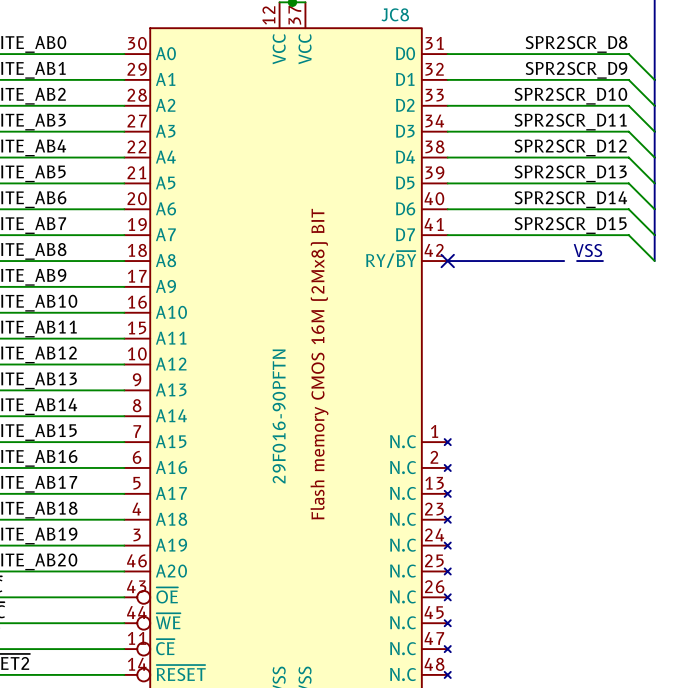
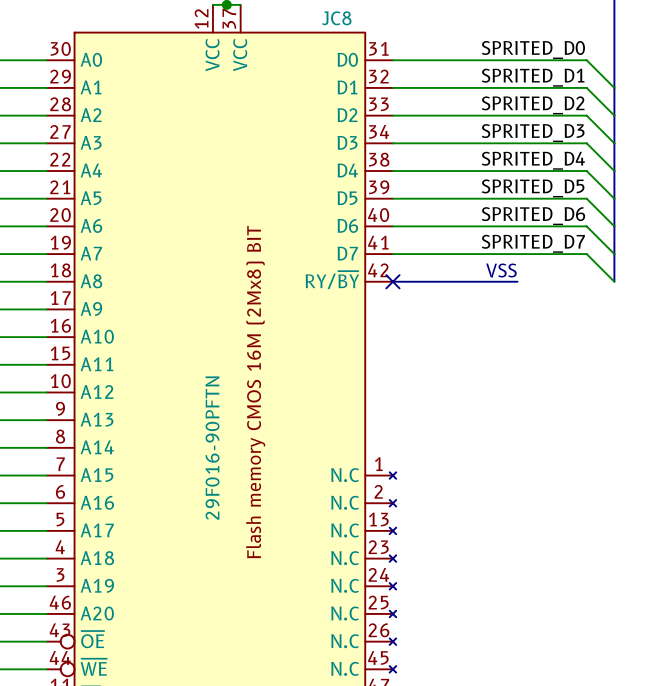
label: SPR2SCR_D8 (576, 44) -> SPRITED_D0 (533, 49)
label: SPR2SCR_D9 (576, 70) -> SPRITED_D1 (533, 77)
label: SPR2SCR_D10 (570, 96) -> SPRITED_D2 (533, 105)
label: SPR2SCR_D11 (570, 122) -> SPRITED_D3 (533, 133)
label: SPR2SCR_D12 (570, 147) -> SPRITED_D4 (533, 160)
label: SPR2SCR_D13 (570, 173) -> SPRITED_D5 (533, 188)
label: SPR2SCR_D14 (570, 199) -> SPRITED_D6 (533, 216)
label: SPR2SCR_D15 (570, 225) -> SPRITED_D7 (533, 243)
text position: VSS (587, 250) -> VSS (501, 270)
line: (577, 261) (602, 261) -> none

